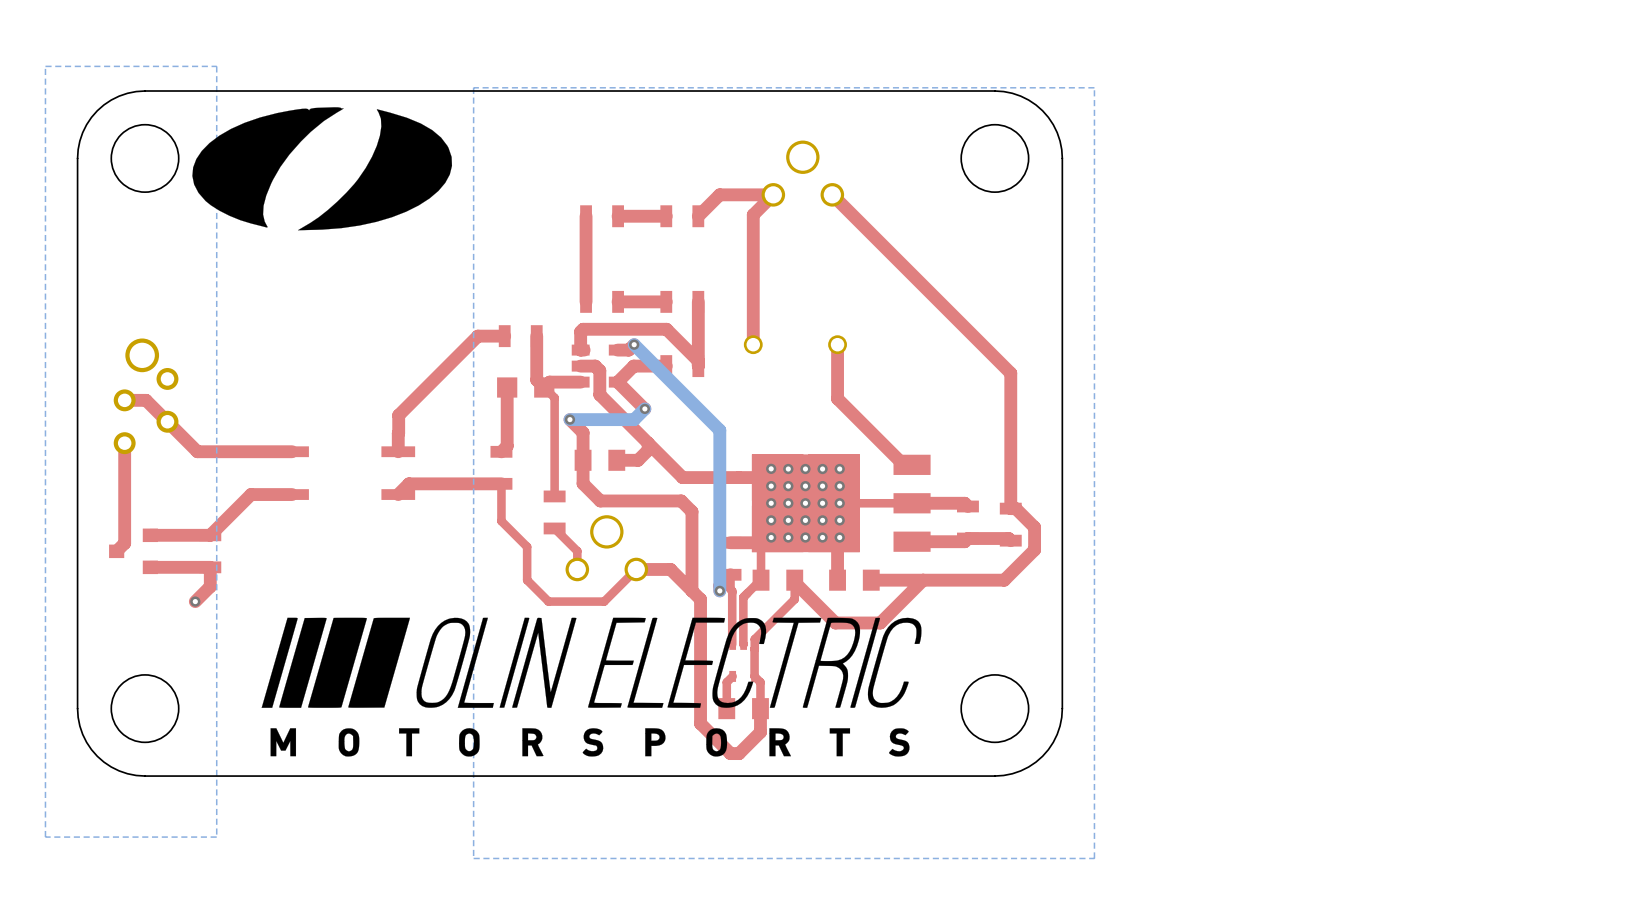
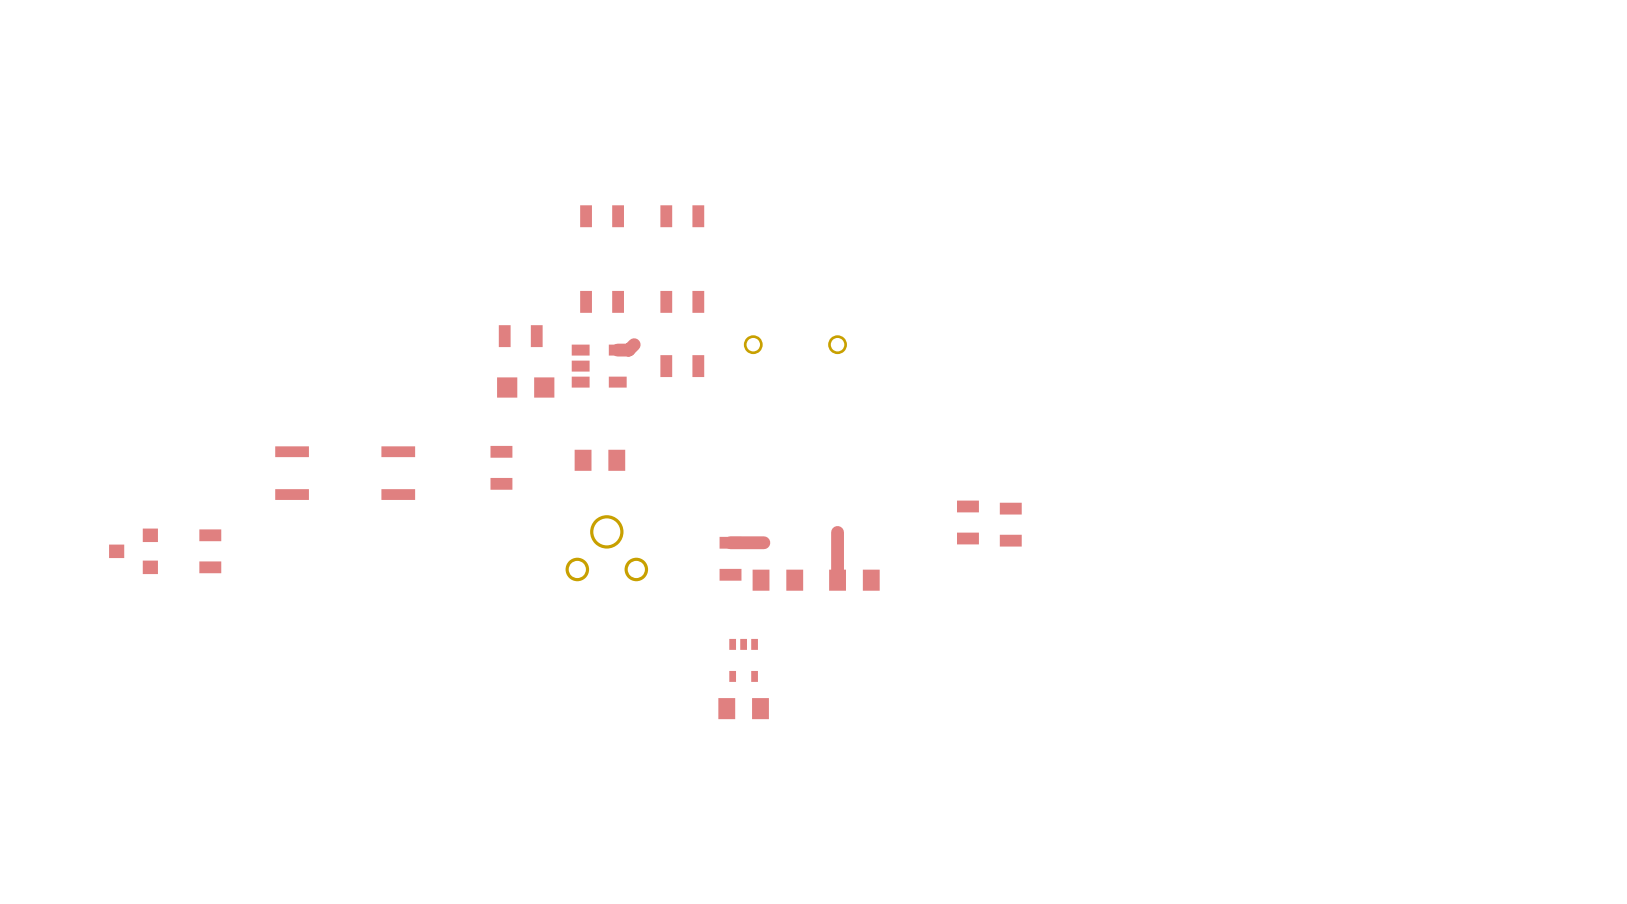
bottom zone outline: (216, 66) (45, 66) (45, 837) (216, 837) (216, 66) -> none
bottom zone outline: (1094, 87) (1094, 858) (473, 858) (473, 87) (1094, 87) -> none
board edge: (994, 91) (145, 91) (119, 96) (103, 104) (91, 117) (82, 132) (77, 158) (77, 708) (79, 726) (91, 749) (103, 762) (119, 770) (145, 776) (994, 776) (1012, 773) (1035, 762) (1048, 749) (1057, 734) (1062, 708) (1062, 158) (1057, 132) (1042, 110) (1020, 96) (994, 91) -> none
drawing: [192, 107, 453, 231] -> none
round board edge: [110, 123, 180, 193] -> none
round board edge: [960, 123, 1030, 193] -> none
part: (802, 173) -> none
top track: (832, 194) (1010, 373) (1010, 508) (1015, 508) (1034, 527) (1034, 549) (1004, 580) (871, 580) -> none
top track: (586, 216) (586, 301) -> none
top track: (666, 216) (618, 216) -> none
top track: (698, 216) (719, 194) (773, 194) (753, 214) (753, 344) -> none
top track: (666, 301) (618, 301) -> none
top track: (698, 301) (698, 366) -> none
top track: (504, 336) (477, 336) (398, 415) (398, 451) -> none
top track: (536, 336) (536, 379) (544, 387) -> none
bottom track: (634, 344) (719, 430) (719, 590) -> none
via: (634, 344) -> none
top track: (837, 344) (837, 398) (903, 464) (912, 464) -> none
top track: (584, 350) (580, 350) (580, 331) (583, 329) (666, 329) (698, 361) -> none
top track: (580, 366) (595, 366) (599, 370) (599, 394) (682, 477) (777, 477) -> none
top track: (666, 366) (633, 366) (617, 382) (644, 408) -> none
top track: (580, 382) (549, 382) (544, 387) -> none
top track: (507, 387) (507, 446) (501, 451) -> none
top track: (544, 387) (554, 397) (554, 496) -> none
part: (146, 396) -> none
top track: (124, 400) (146, 400) (197, 451) (292, 451) -> none
bottom track: (644, 408) (634, 419) (569, 419) -> none
via: (644, 408) -> none
top track: (569, 419) (583, 432) (583, 483) (600, 500) (681, 500) (691, 511) (691, 590) -> none
via: (569, 419) -> none
top track: (124, 443) (124, 543) (116, 551) -> none
top track: (648, 443) (648, 450) (638, 460) (616, 460) -> none
via: (771, 468) -> none
via: (788, 469) -> none
via: (805, 469) -> none
via: (822, 469) -> none
via: (839, 469) -> none
via: (771, 486) -> none
via: (788, 486) -> none
via: (805, 486) -> none
via: (822, 486) -> none
via: (839, 486) -> none
top track: (292, 494) (251, 494) (210, 535) (150, 535) -> none
top track: (398, 494) (408, 483) (501, 483) (501, 521) (527, 546) (527, 580) (548, 601) (604, 601) (636, 569) (670, 569) (700, 599) (700, 723) (730, 753) (739, 753) (760, 732) (760, 682) (754, 676) (754, 649) -> none
via: (771, 503) -> none
via: (788, 503) -> none
top track: (805, 503) (761, 548) (761, 580) (743, 597) (743, 644) -> none
via: (805, 503) -> none
via: (822, 503) -> none
top track: (839, 503) (964, 503) (967, 506) -> none
via: (839, 503) -> none
part: (841, 503) -> none
part: (554, 512) -> none
via: (771, 520) -> none
via: (788, 520) -> none
via: (805, 520) -> none
via: (822, 520) -> none
via: (839, 520) -> none
top track: (554, 528) (577, 551) (577, 569) -> none
via: (771, 537) -> none
via: (788, 537) -> none
via: (805, 537) -> none
via: (822, 537) -> none
via: (839, 537) -> none
top track: (1010, 540) (1008, 538) (967, 538) (964, 541) (912, 541) -> none
top track: (150, 567) (210, 567) (210, 586) (195, 601) -> none
top track: (923, 580) (880, 622) (835, 622) (794, 580) (794, 599) (754, 639) (754, 649) -> none
top track: (719, 590) (719, 585) (730, 574) (732, 644) -> none
via: (719, 590) -> none
via: (195, 601) -> none
drawing: [261, 617, 922, 757] -> none
round board edge: [110, 674, 180, 744] -> none
round board edge: [960, 674, 1030, 744] -> none
top track: (732, 676) (726, 682) (726, 708) -> none

